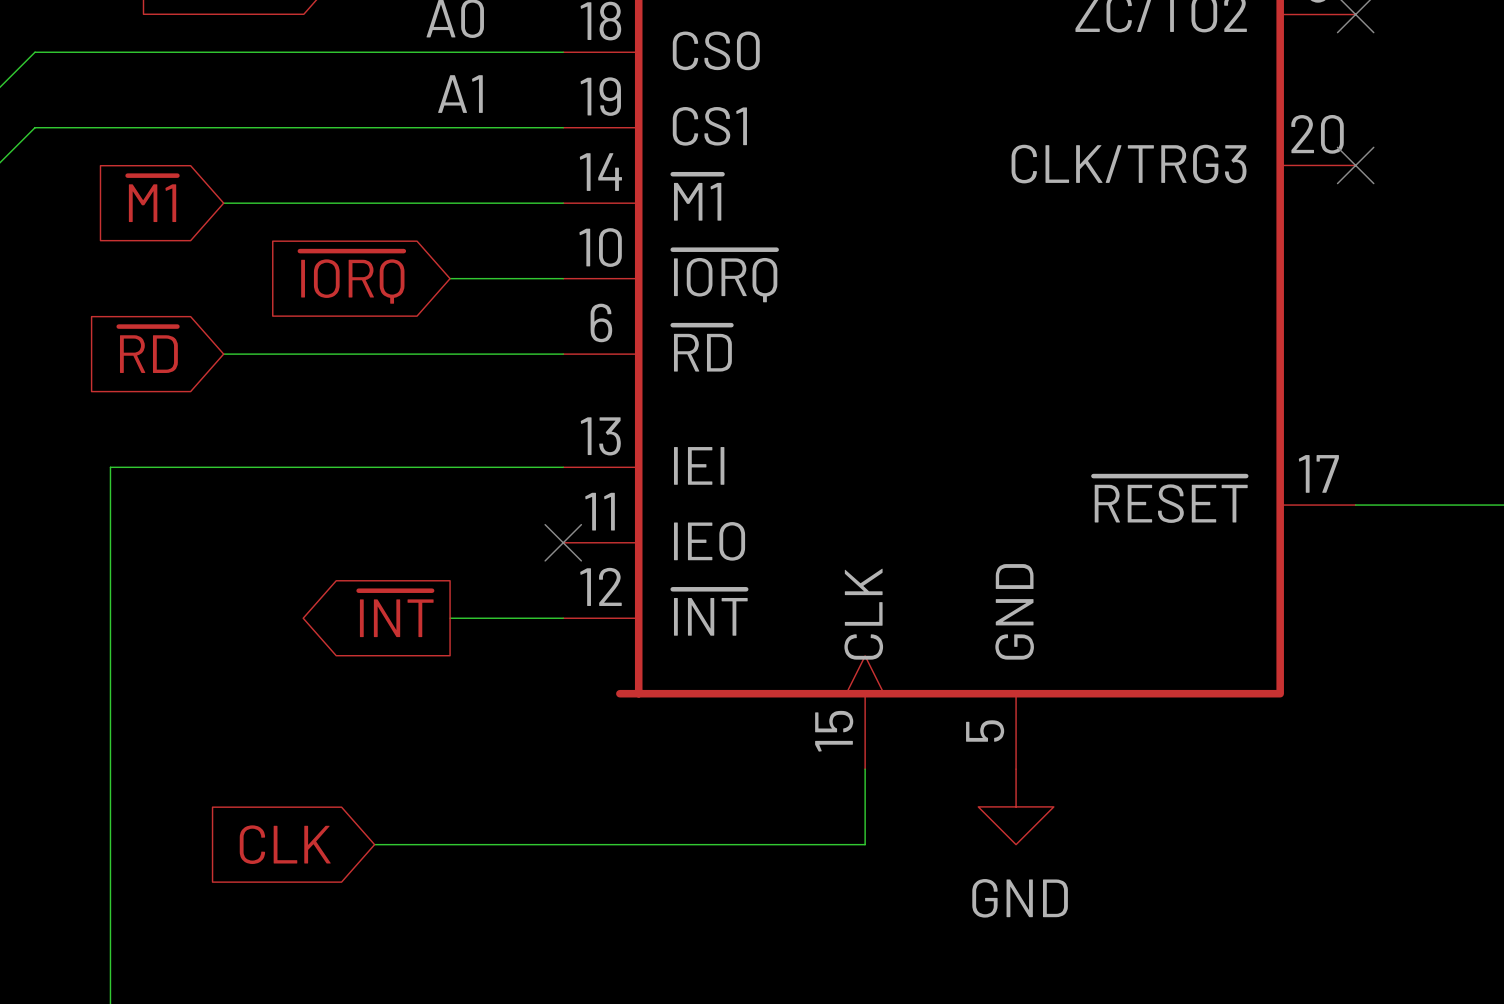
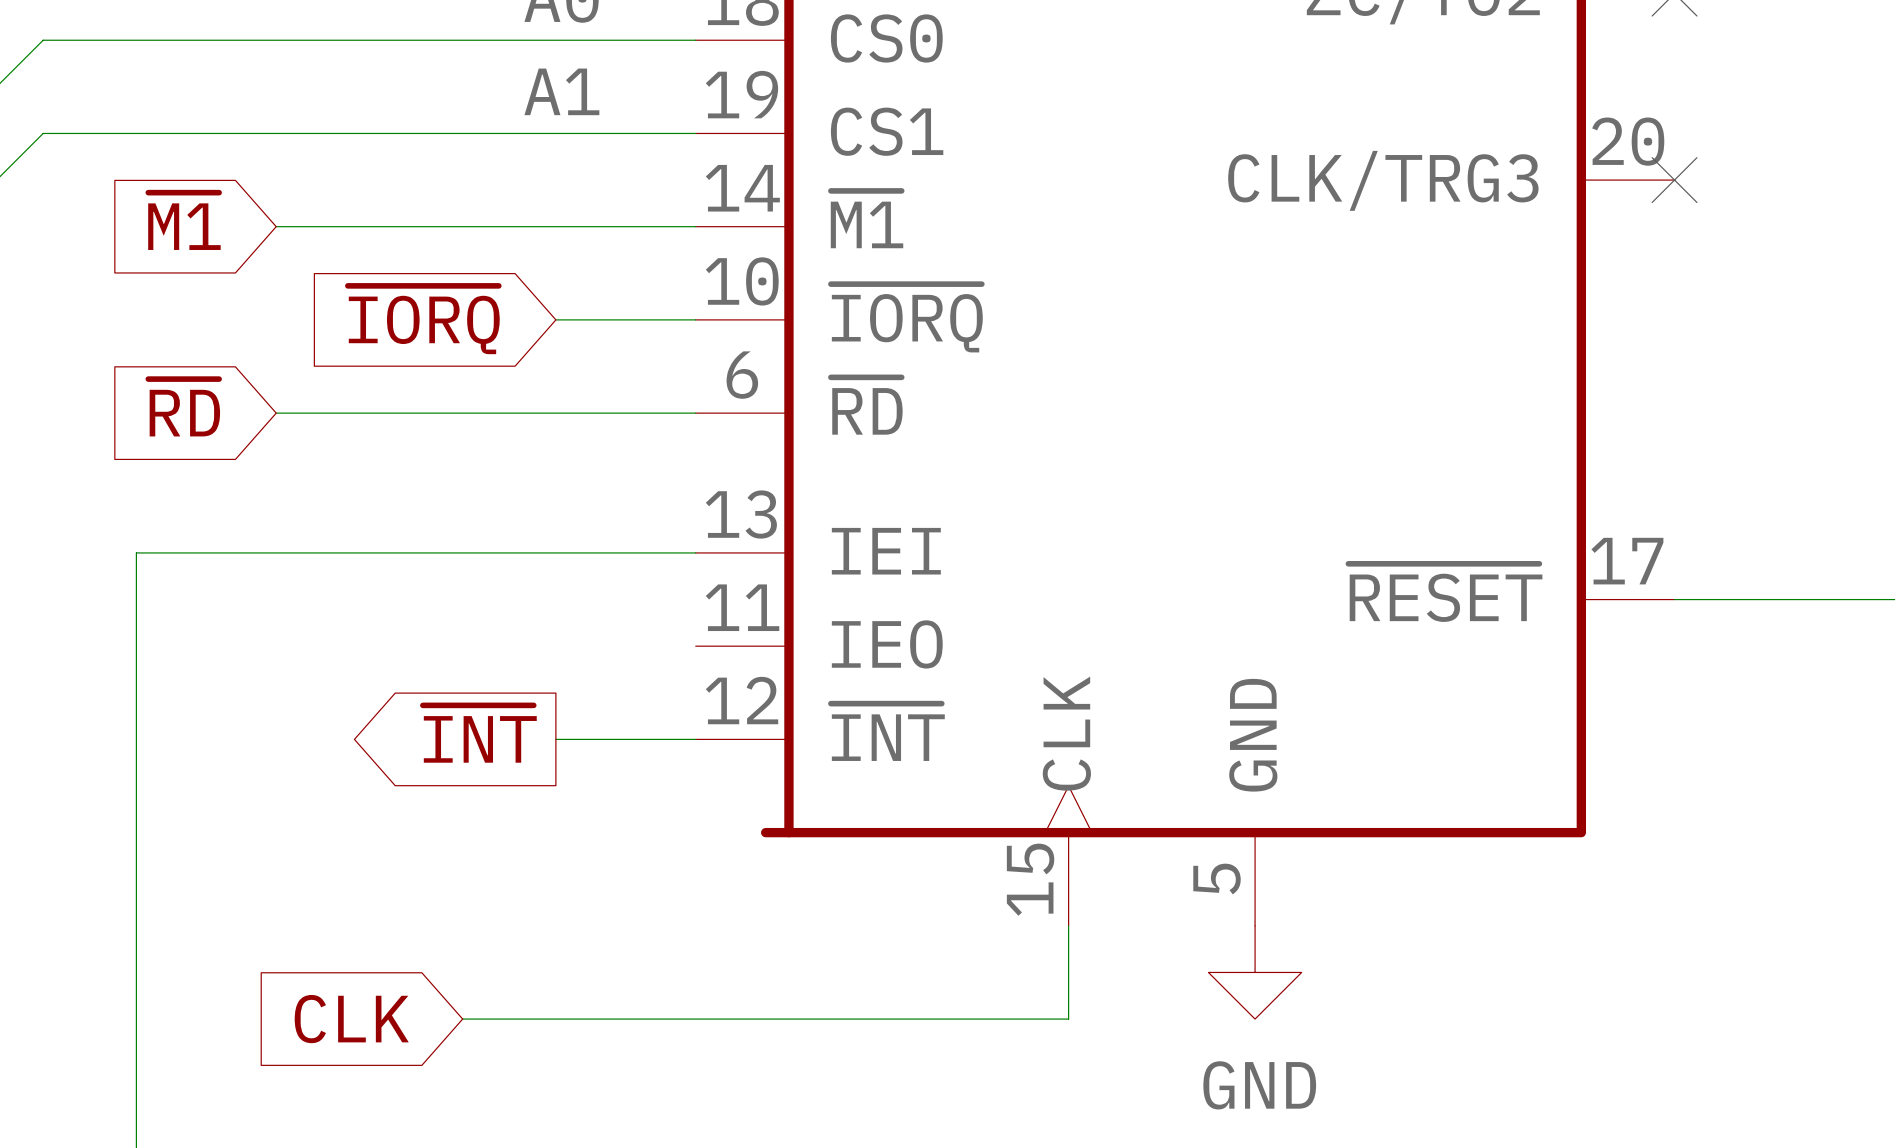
no-connect mark: (563, 542) -> none

